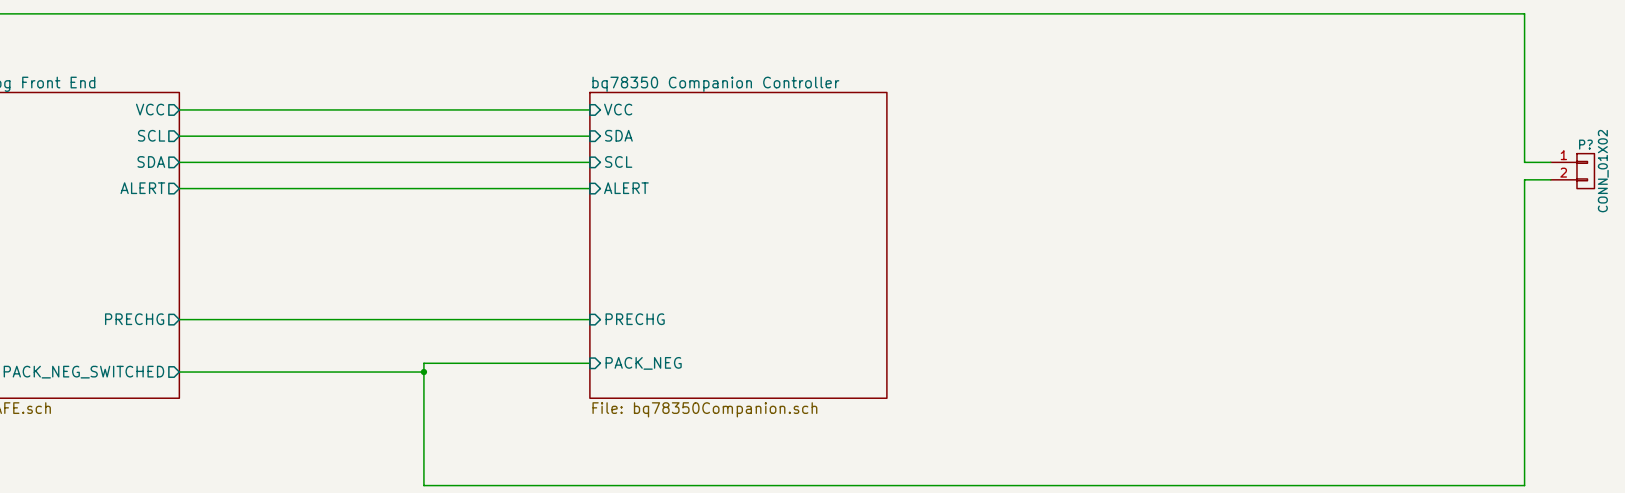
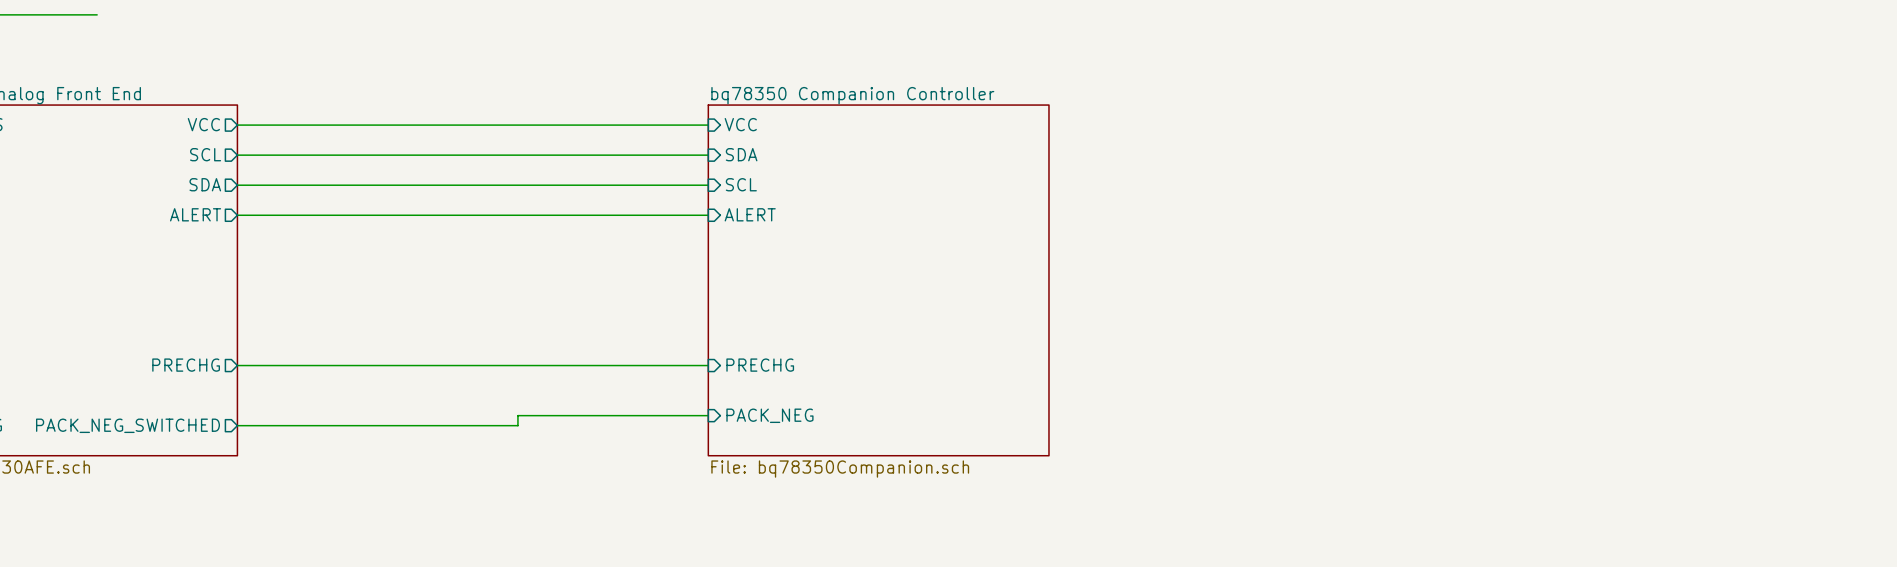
wire: (57, 13) (1524, 13) (1524, 162) (1550, 162) -> none
P?: CONN_01X02 (1572, 171) -> none
wire: (1550, 179) (1524, 179) (1524, 485) (423, 485) (423, 372) -> none
junction: (423, 372) -> none

